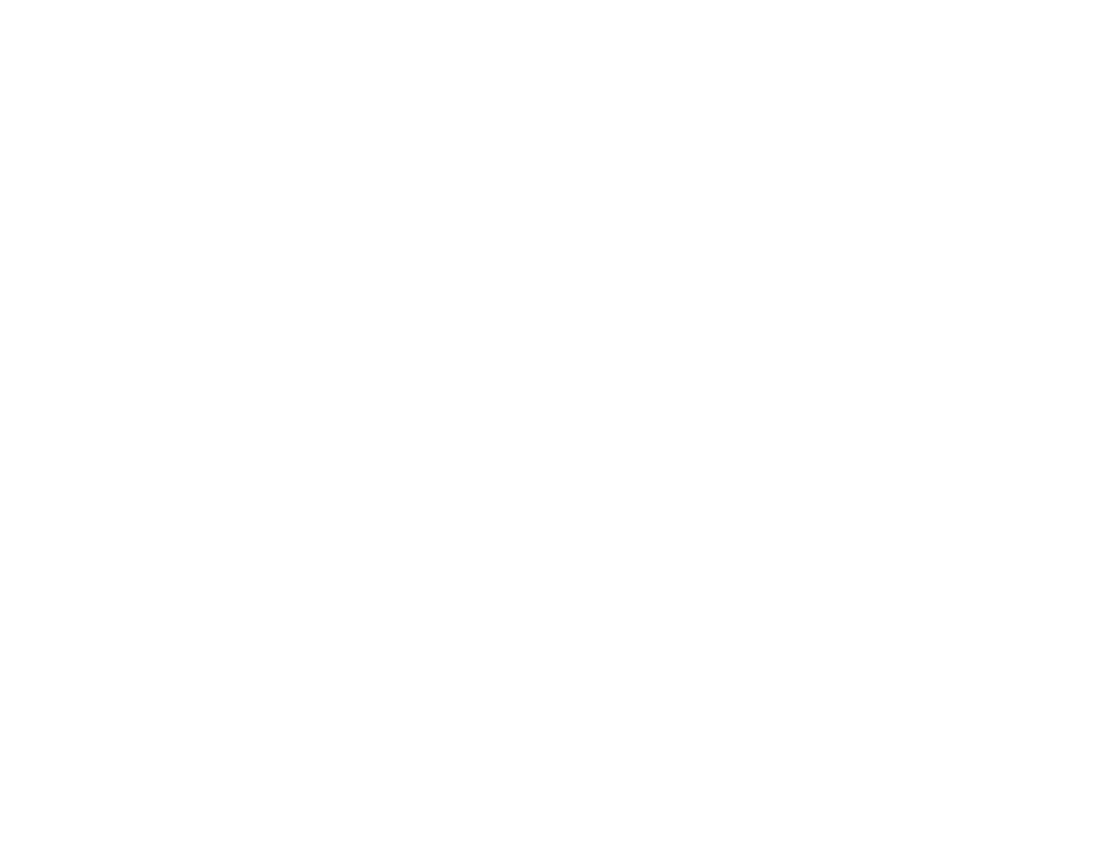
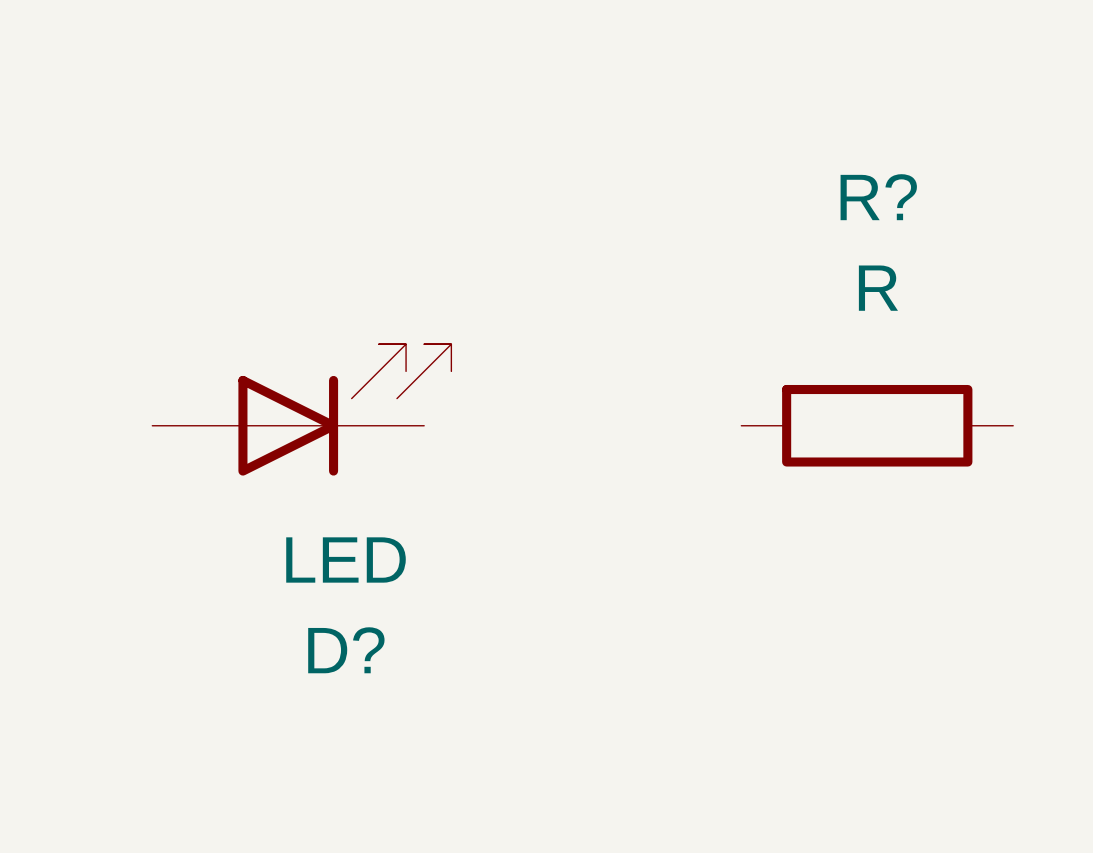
D?: none -> LED (301, 409)
R?: none -> R (877, 425)

